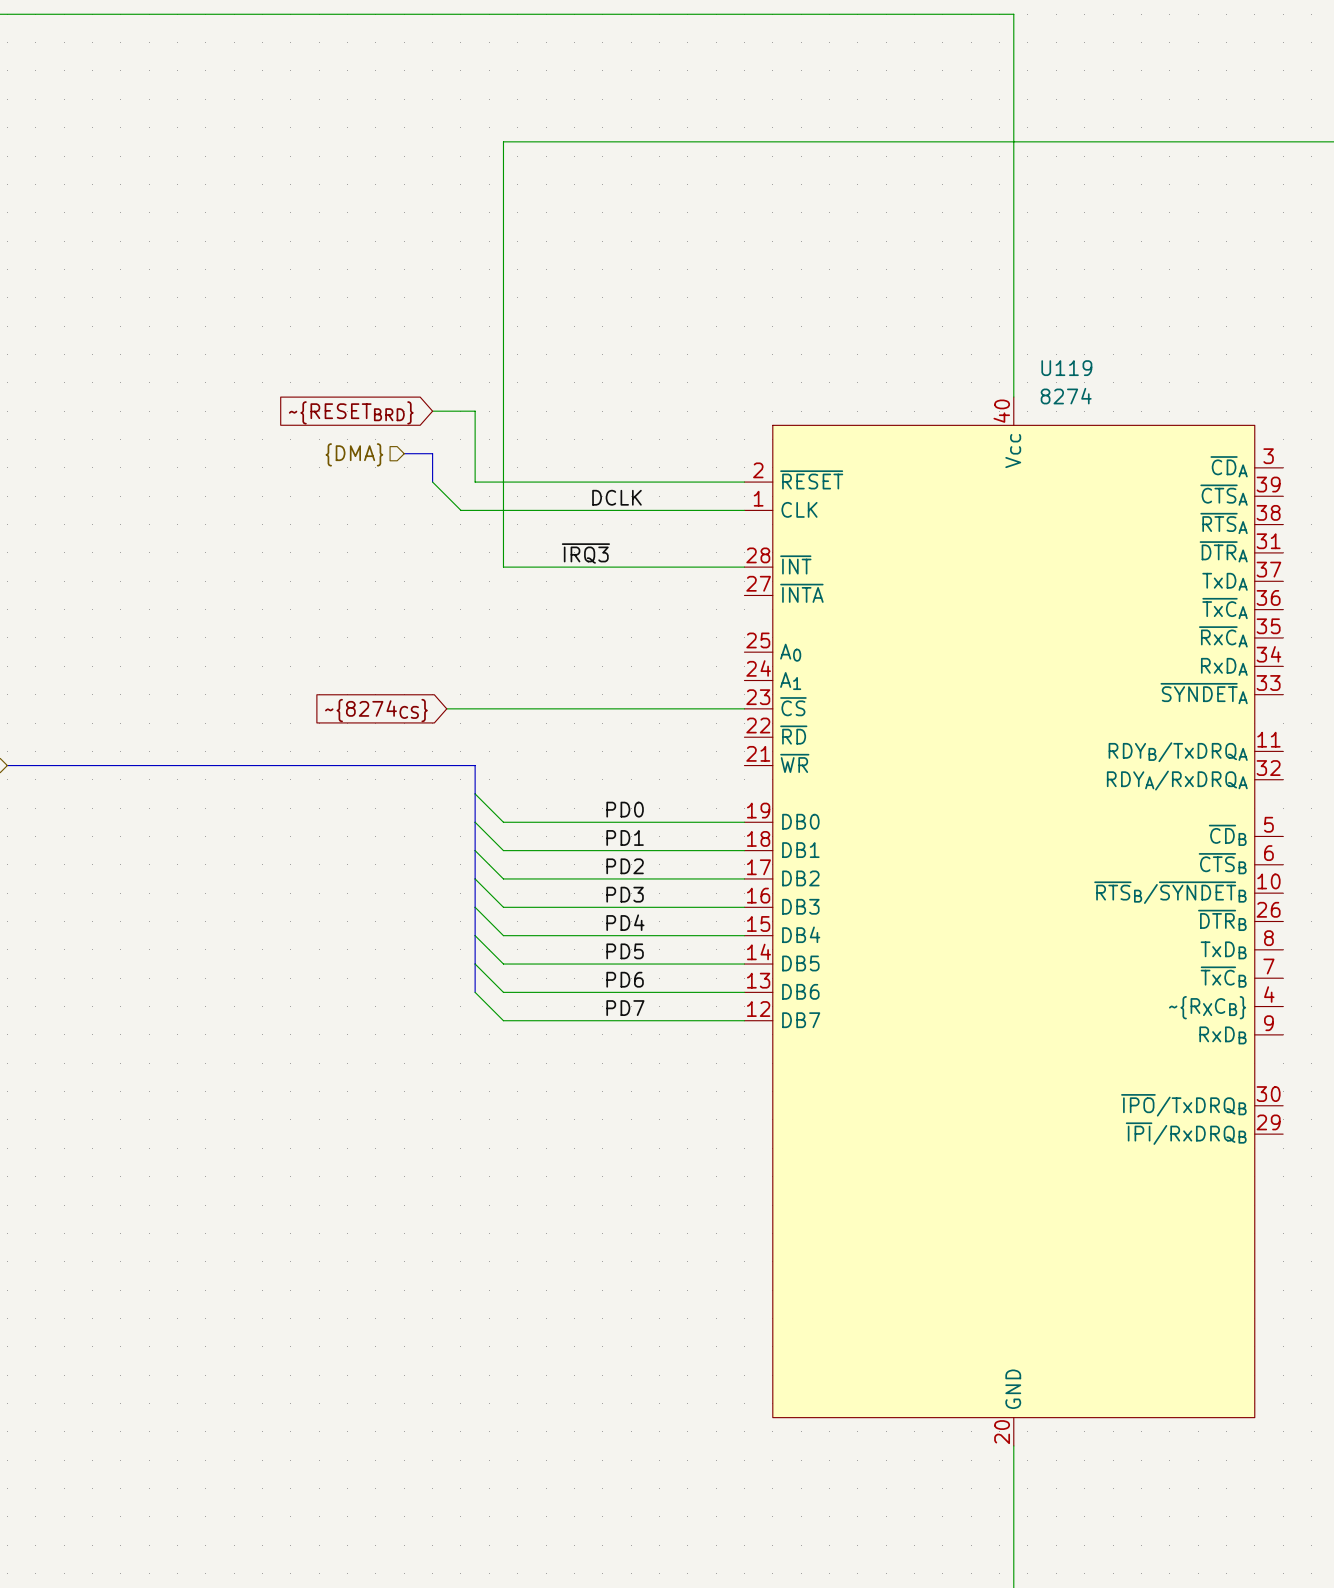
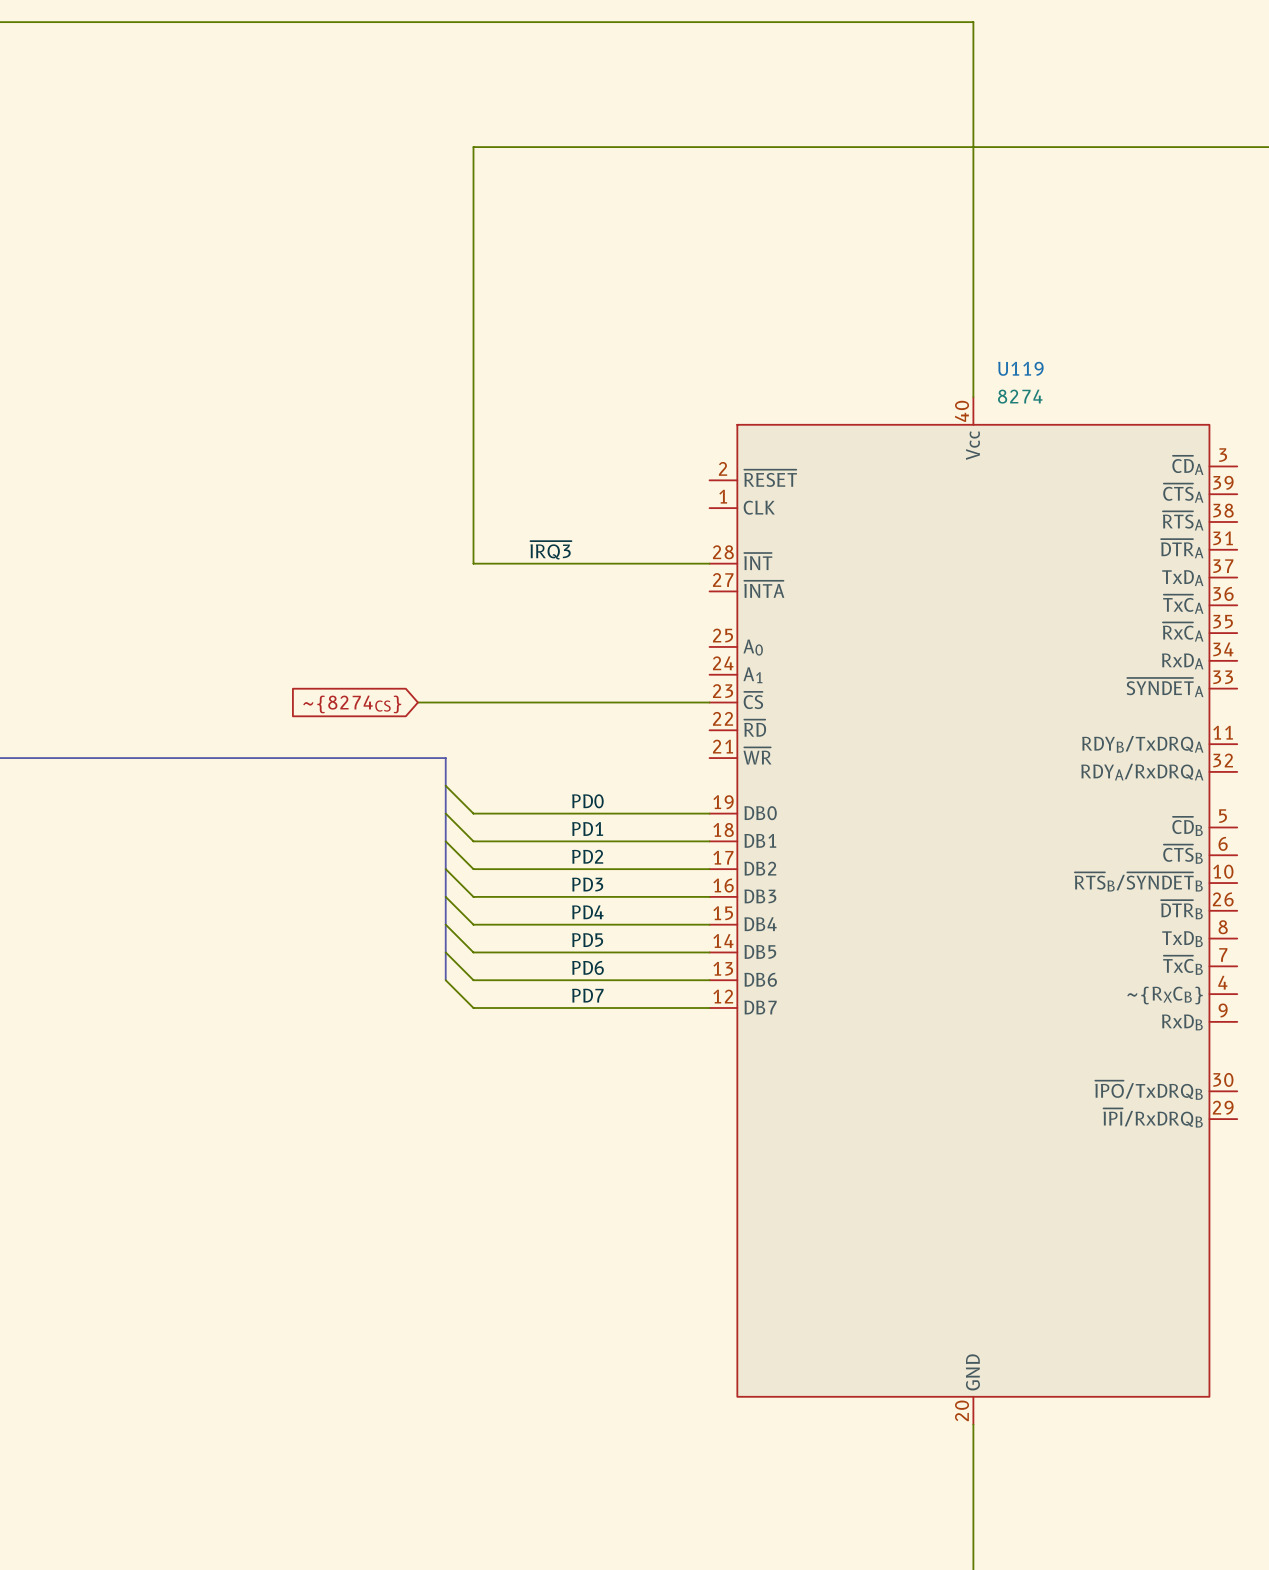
wire: (432, 411) (475, 411) (475, 482) (744, 482) -> none
global label: ~{RESETBRD} (351, 412) -> none
bus: (404, 453) (432, 453) (432, 482) -> none
hierarchical label: {DMA} (354, 454) -> none
wire: (432, 482) (460, 510) (744, 510) -> none
label: DCLK (616, 497) -> none

